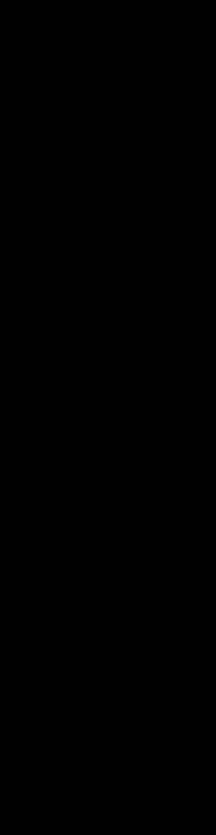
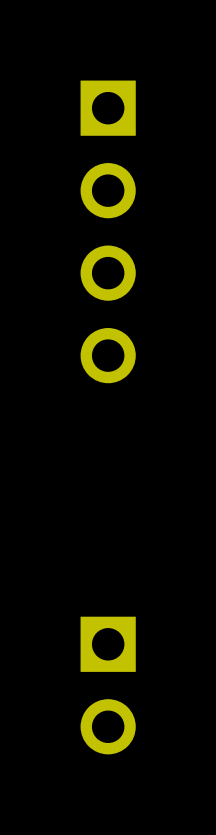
part: none -> (108, 231)
part: none -> (108, 685)

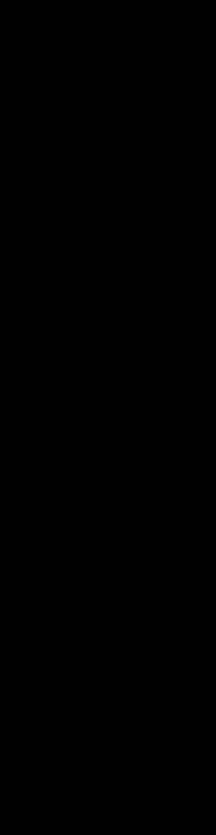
part: (108, 231) -> none
part: (108, 685) -> none

